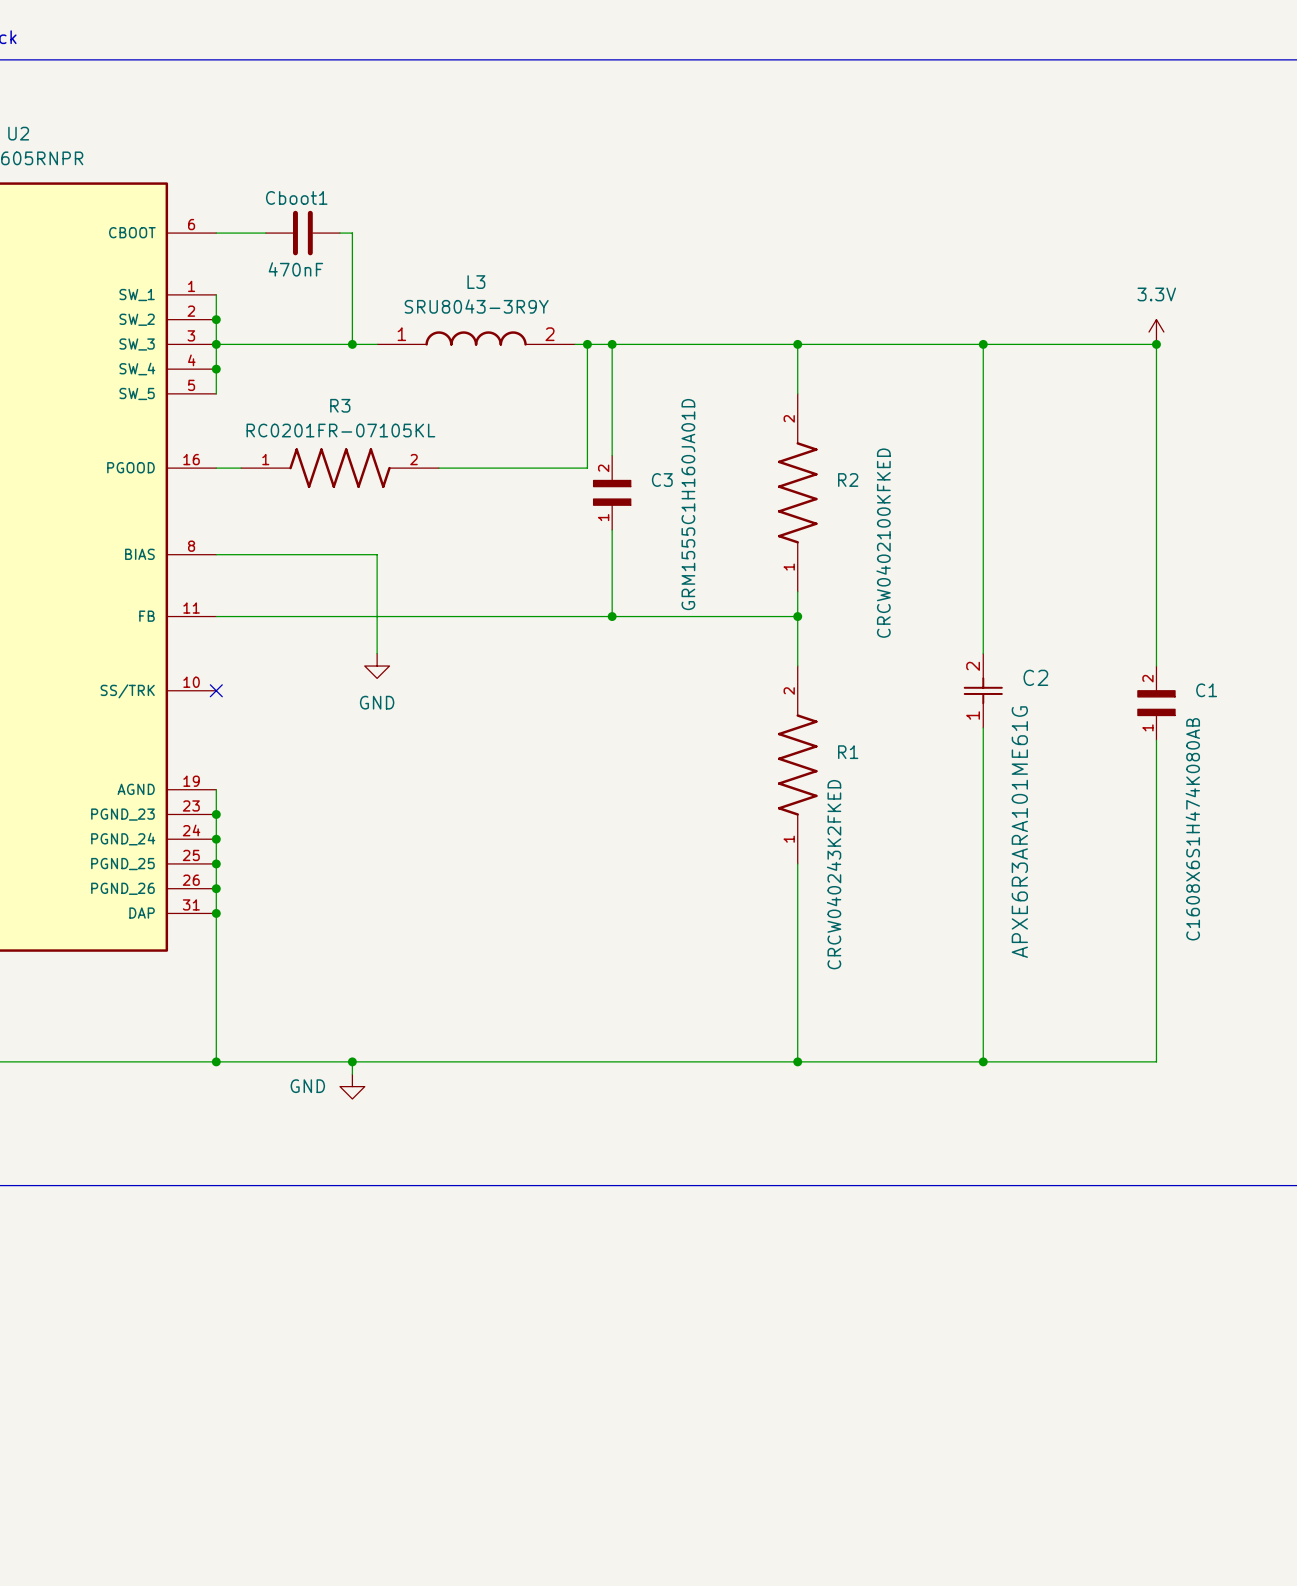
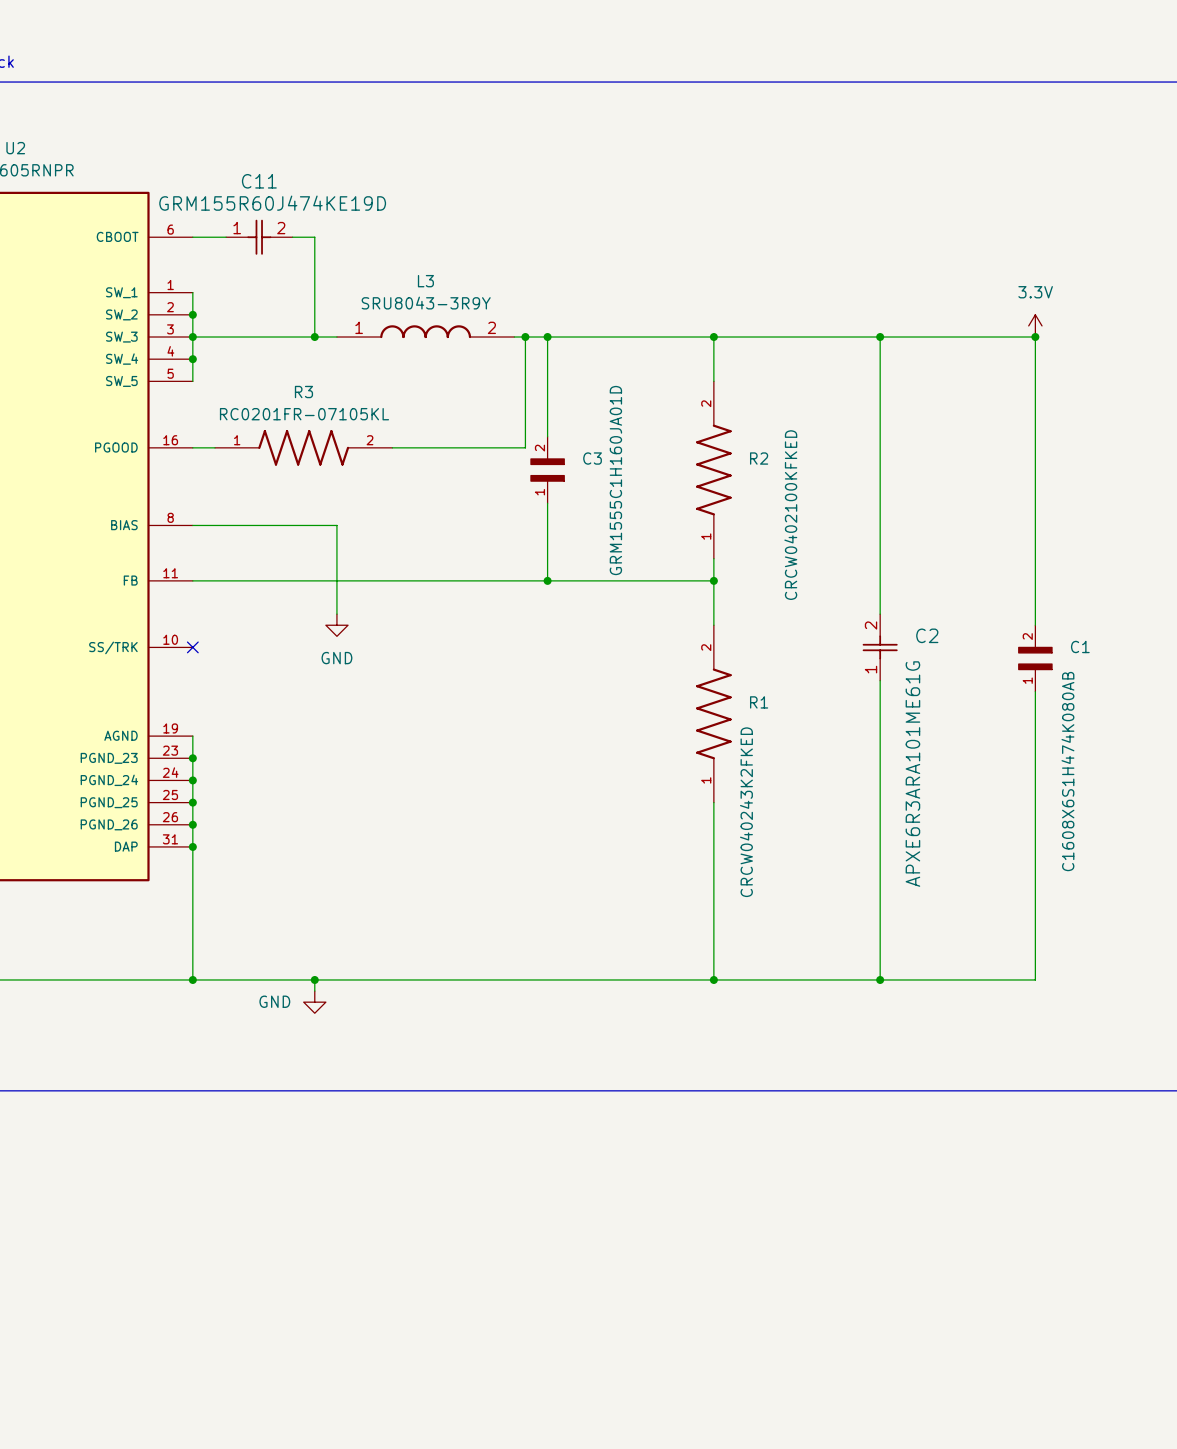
C11: none -> GRM155R60J474KE19D (259, 237)
Cboot1: 470nF (302, 233) -> none

